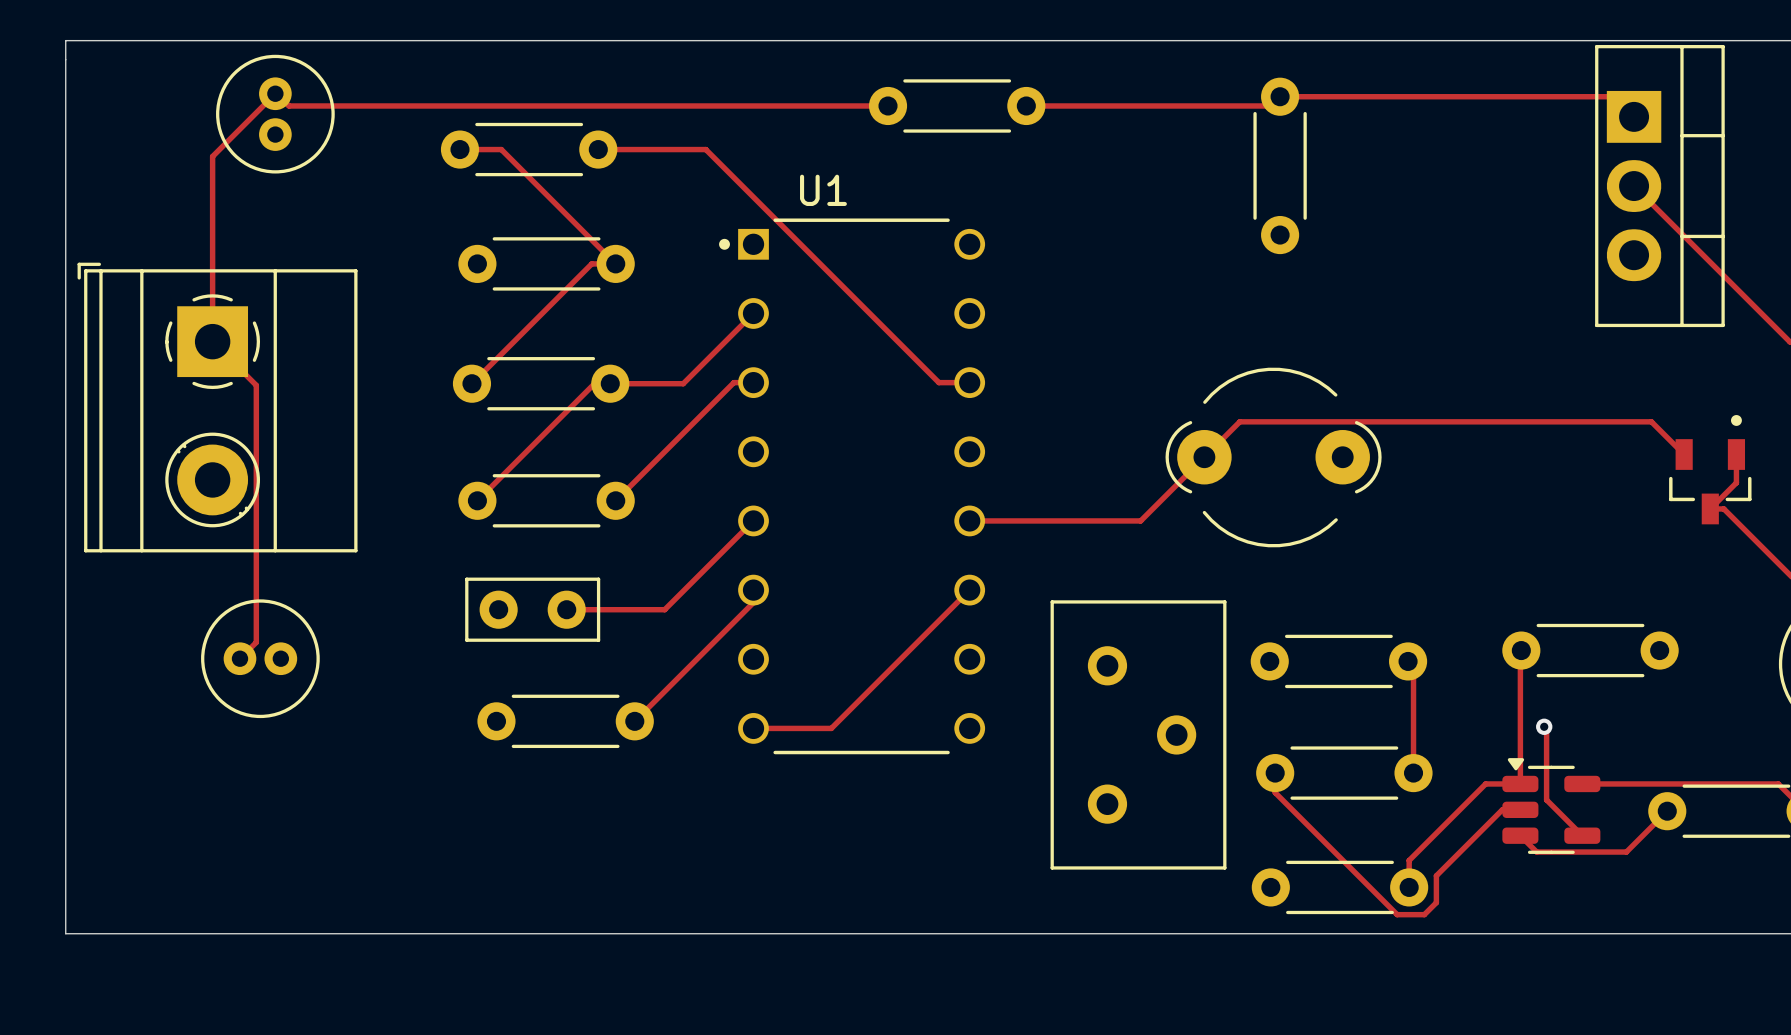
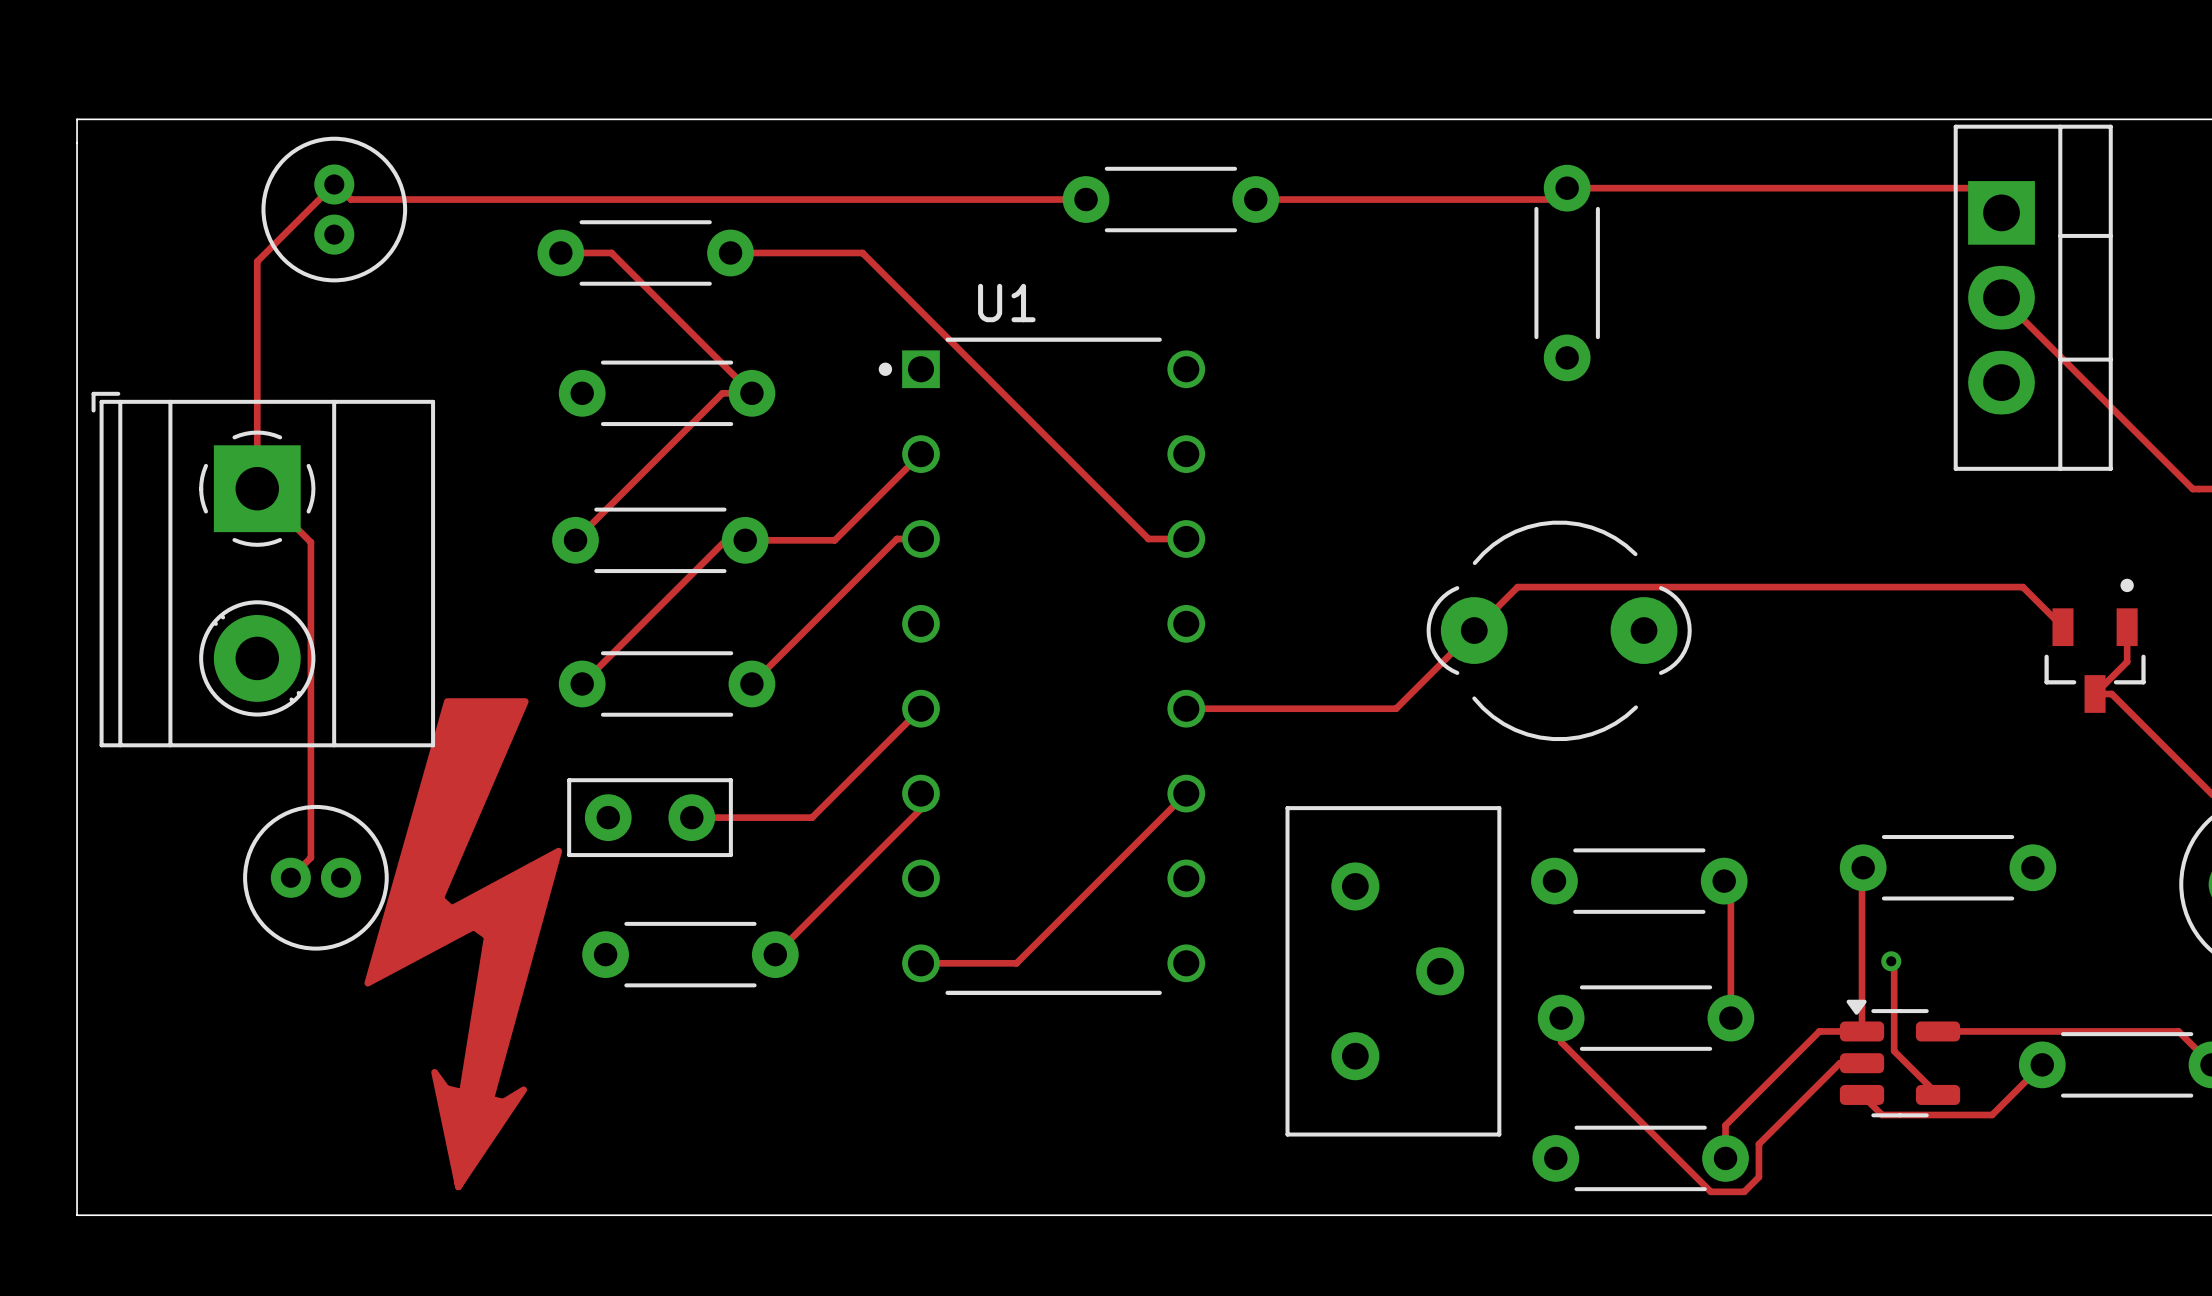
drawing: none -> [364, 698, 563, 1191]

